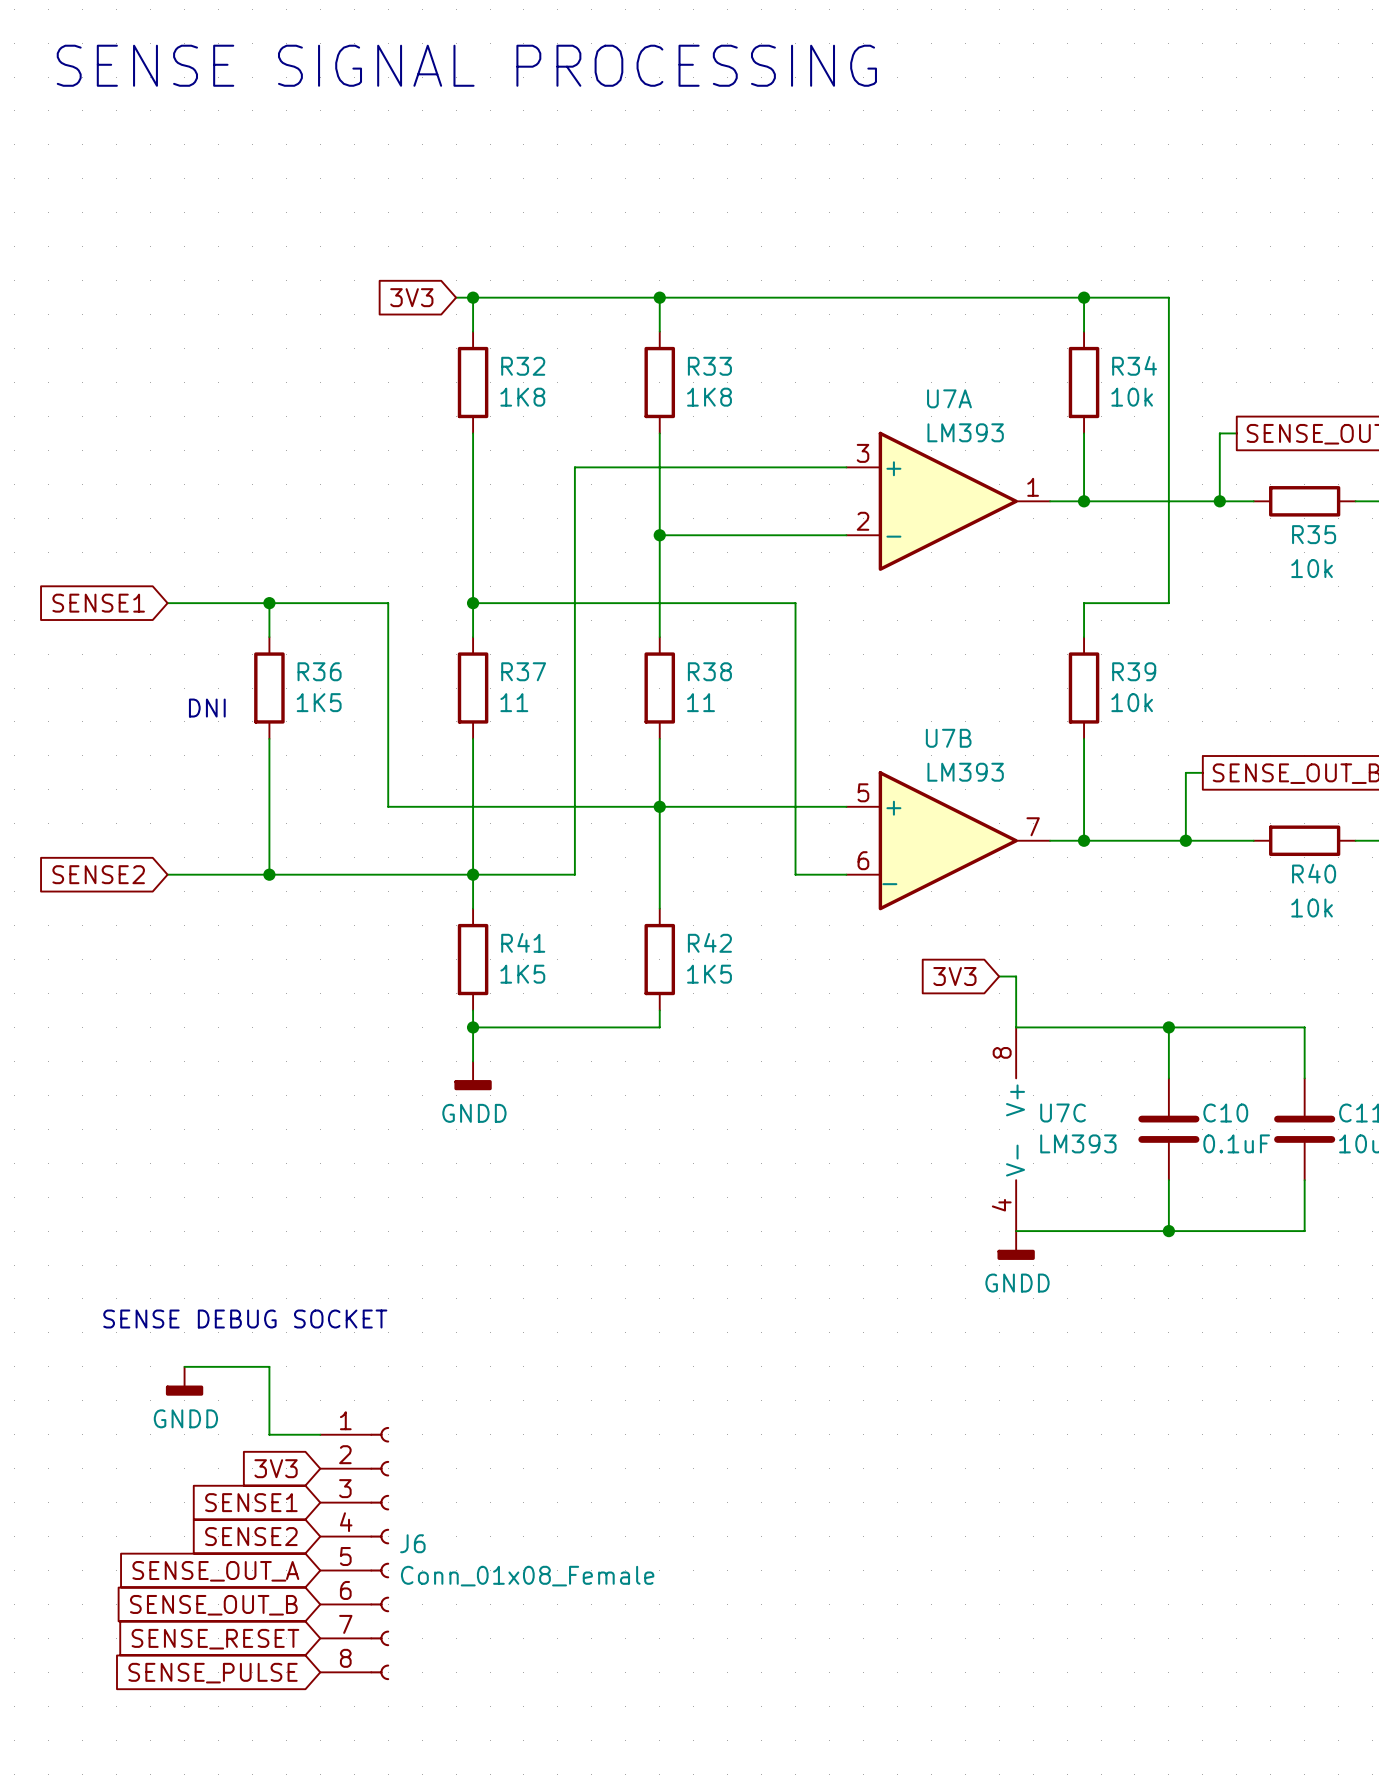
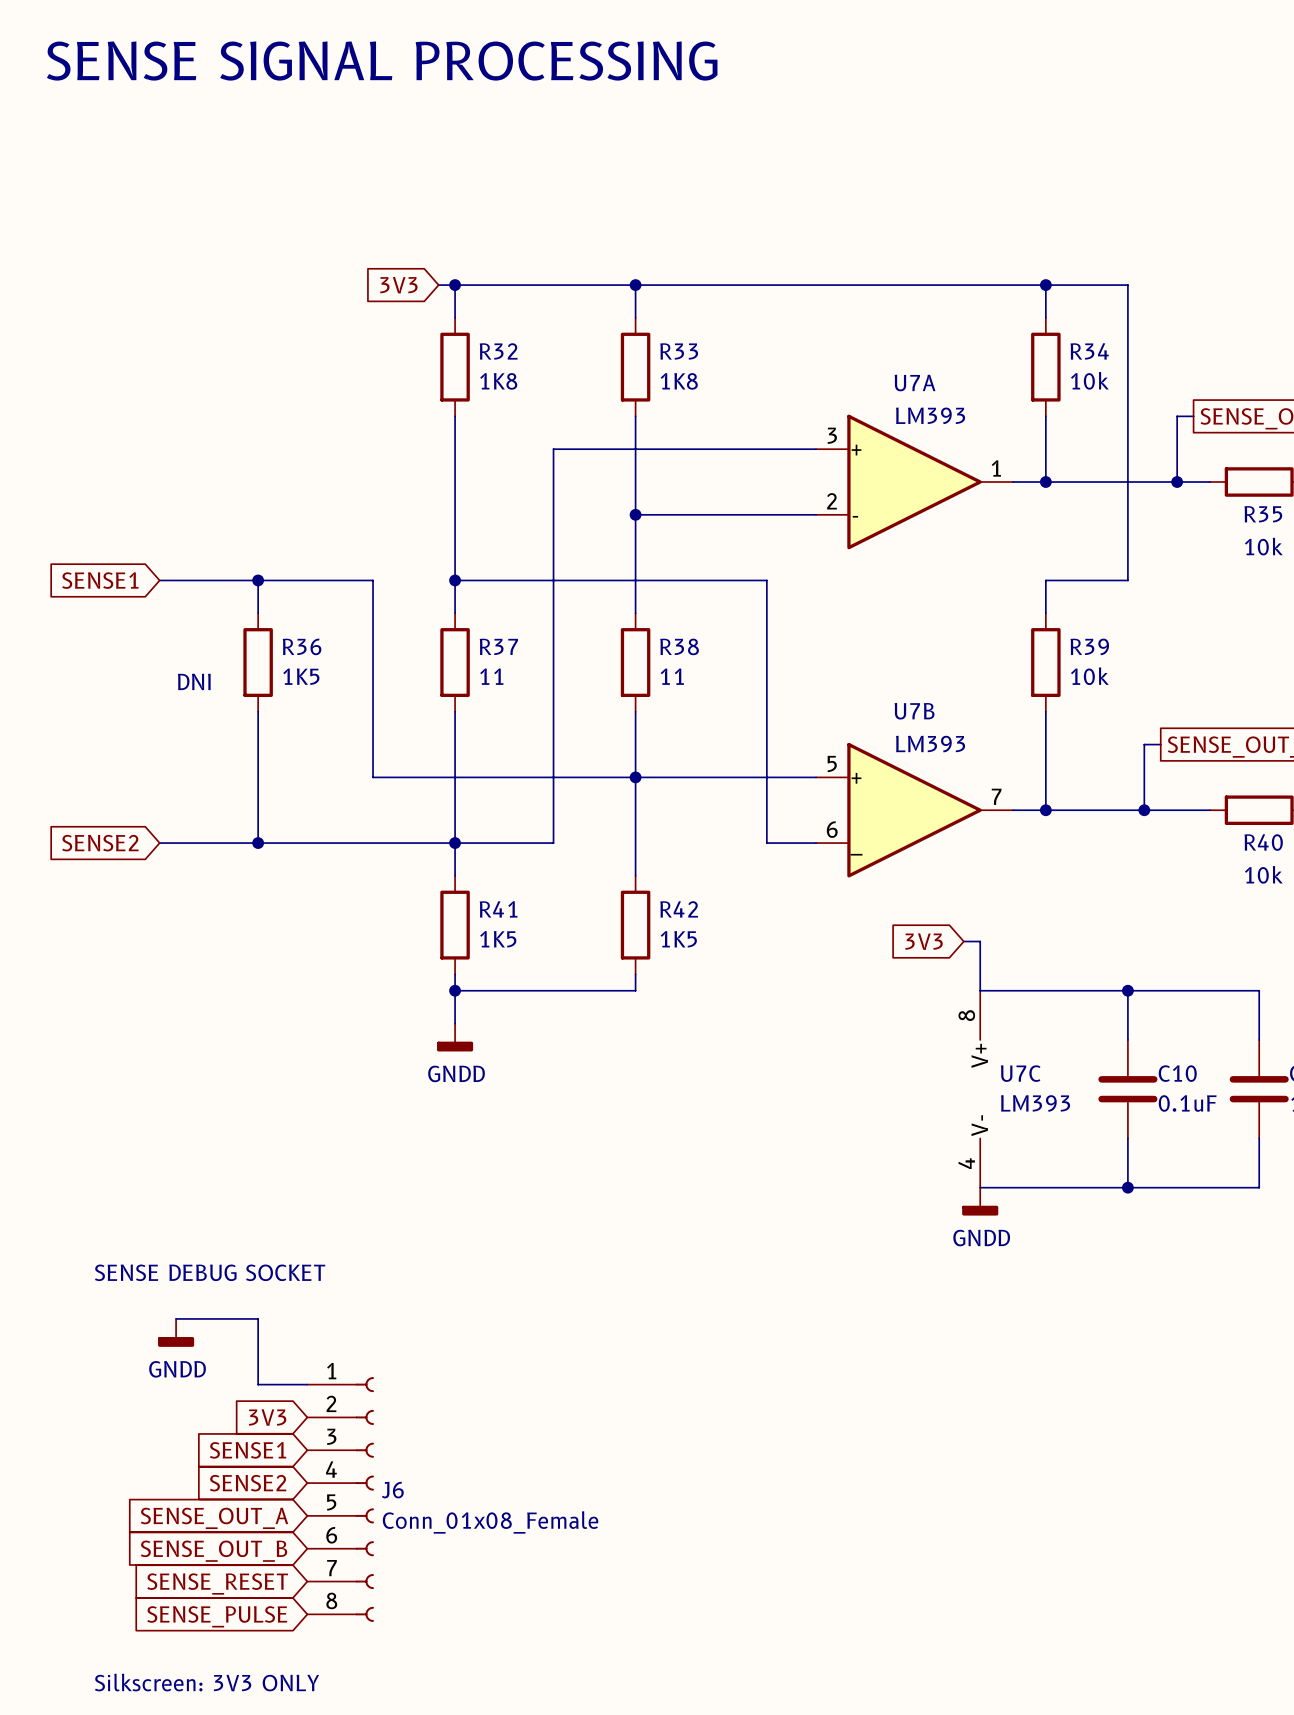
text: none -> Silkscreen: 3V3 ONLY (206, 1682)

